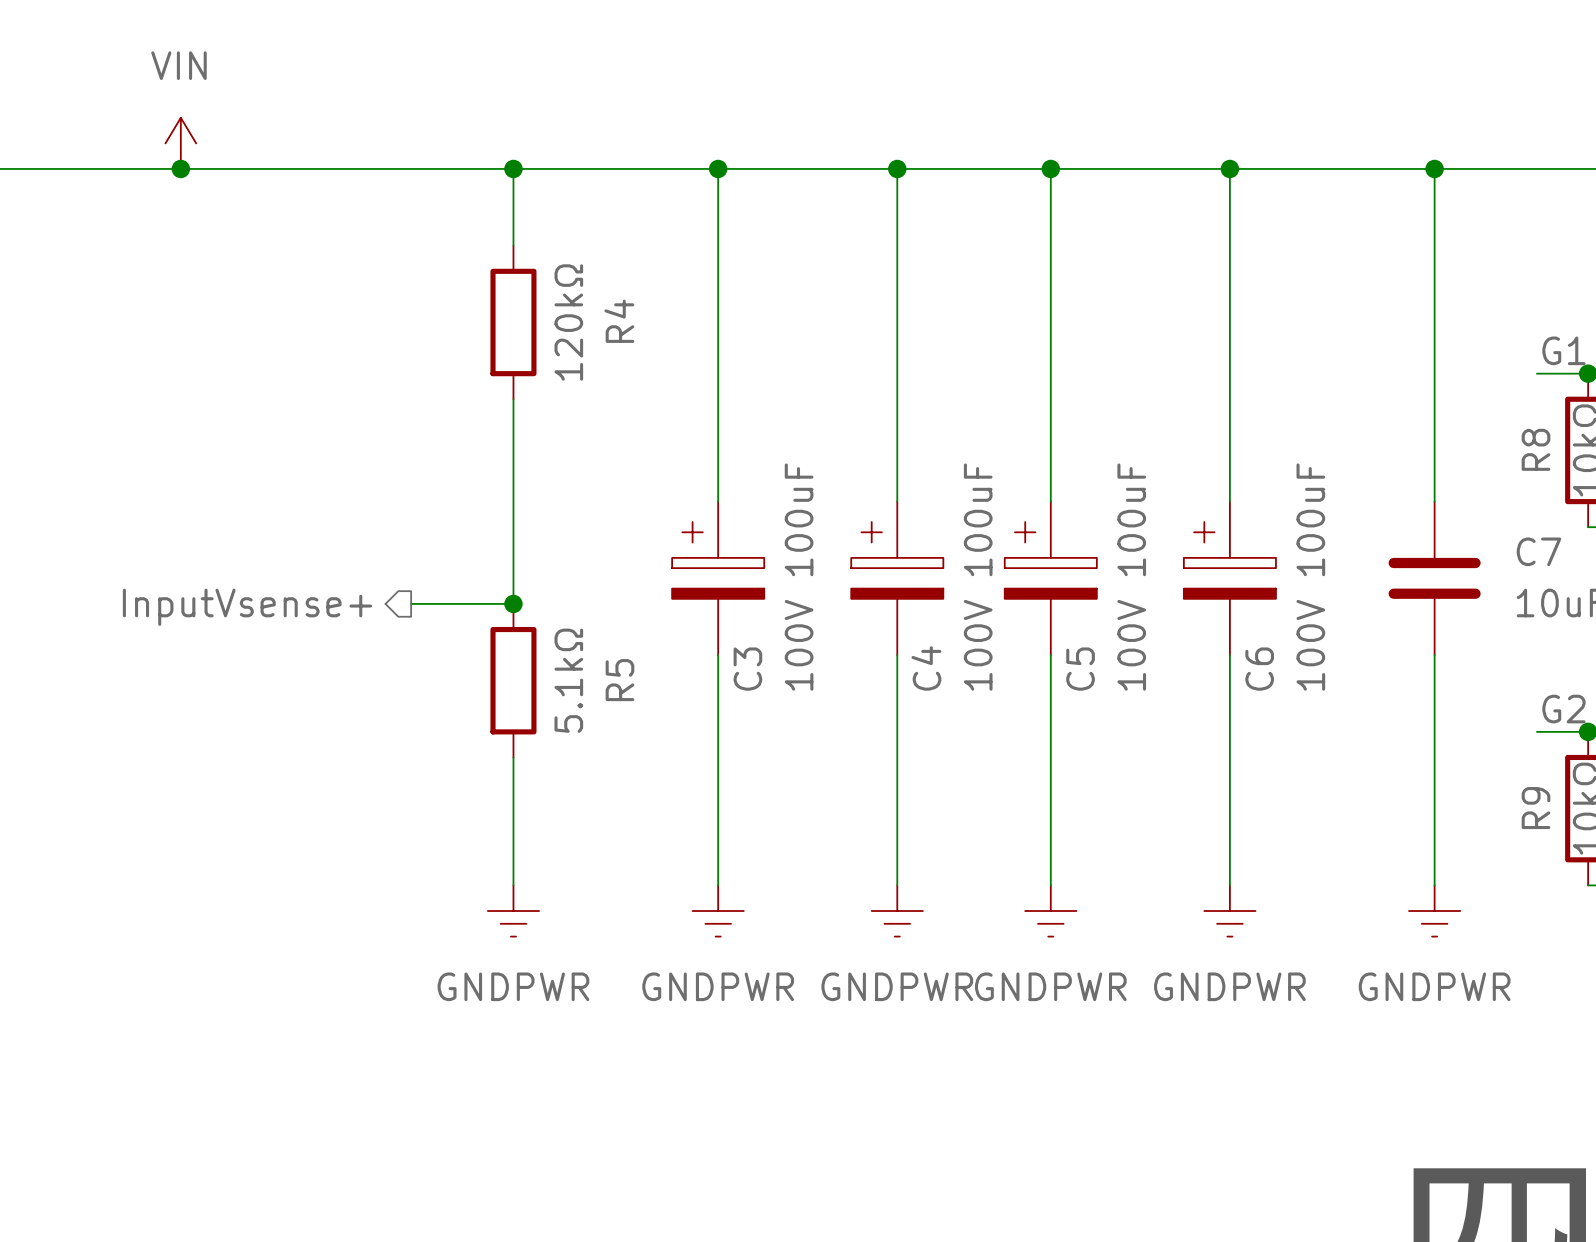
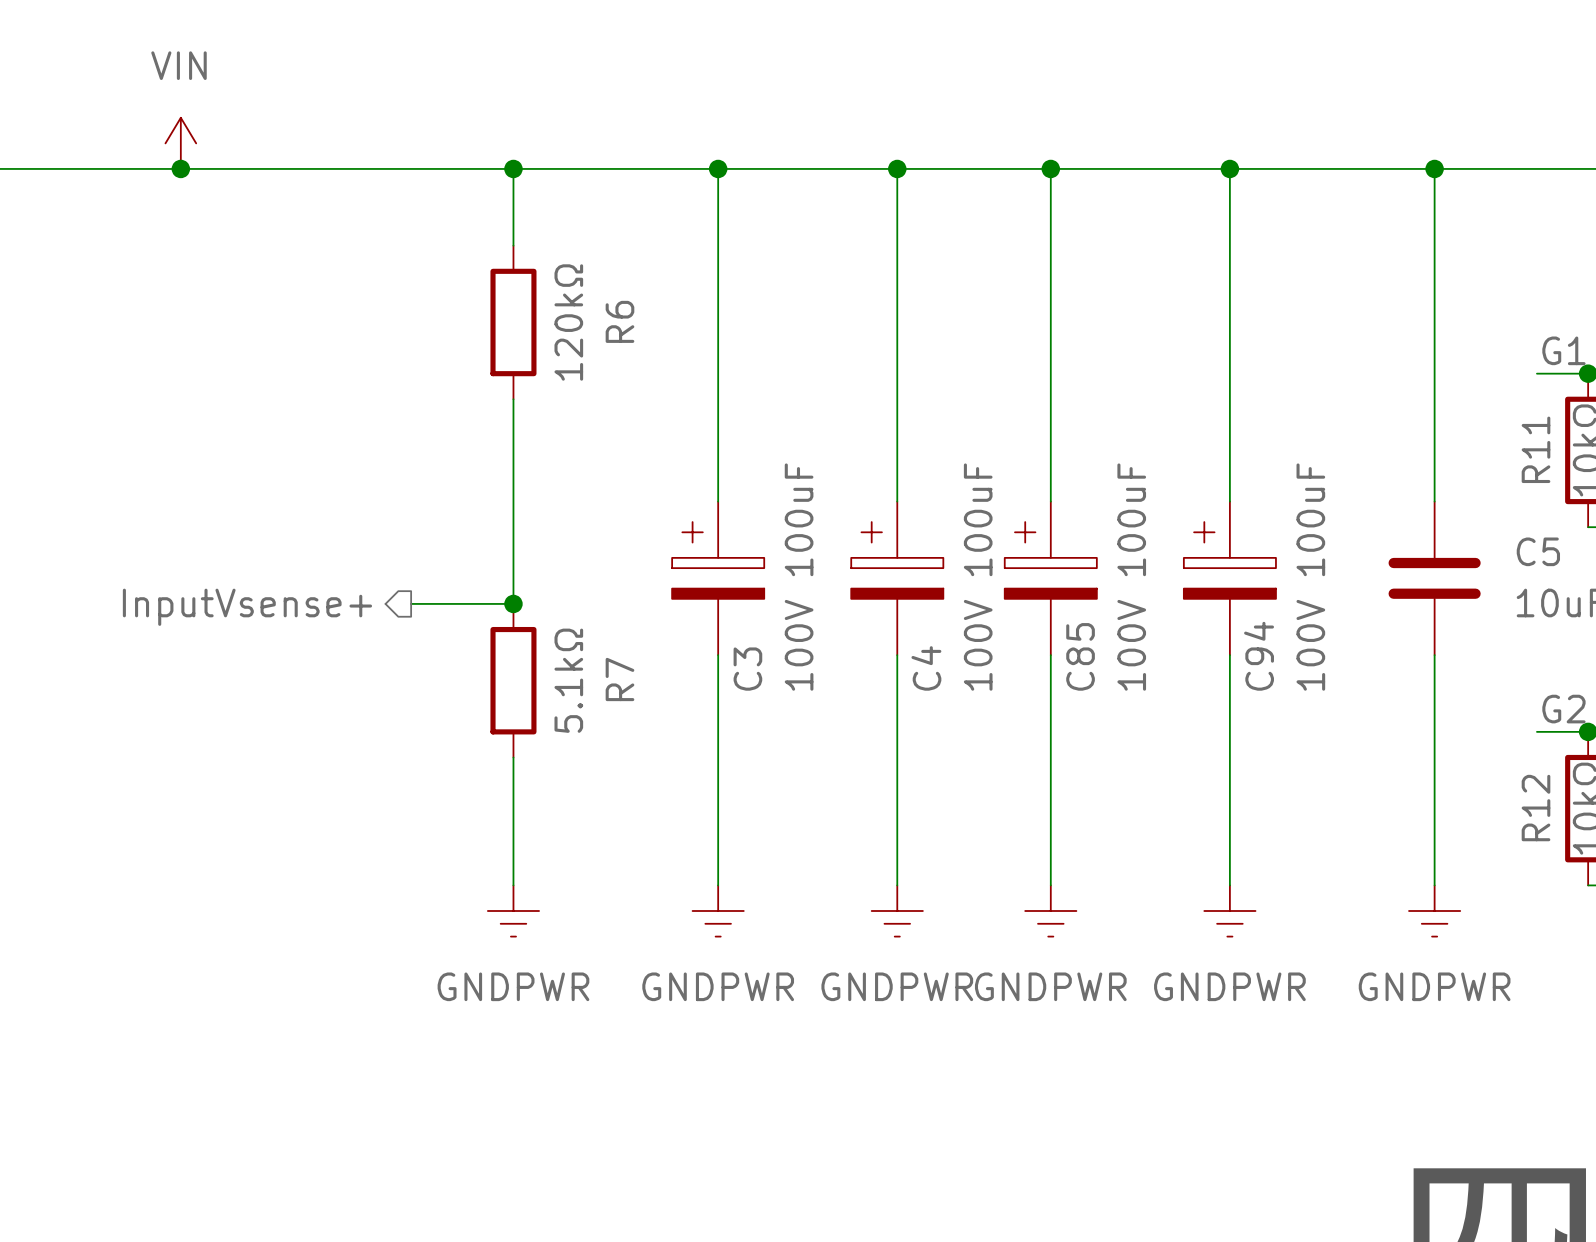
R4 name: R4 (619, 321) -> R6 (619, 321)
R8 name: R8 (1536, 449) -> R11 (1536, 449)
C7 name: C7 (1538, 551) -> C5 (1538, 551)
C5 name: C5 (1080, 669) -> C85 (1080, 656)
C6 name: C6 (1259, 669) -> C94 (1259, 656)
R5 name: R5 (619, 680) -> R7 (619, 679)
R9 name: R9 (1536, 808) -> R12 (1536, 808)

